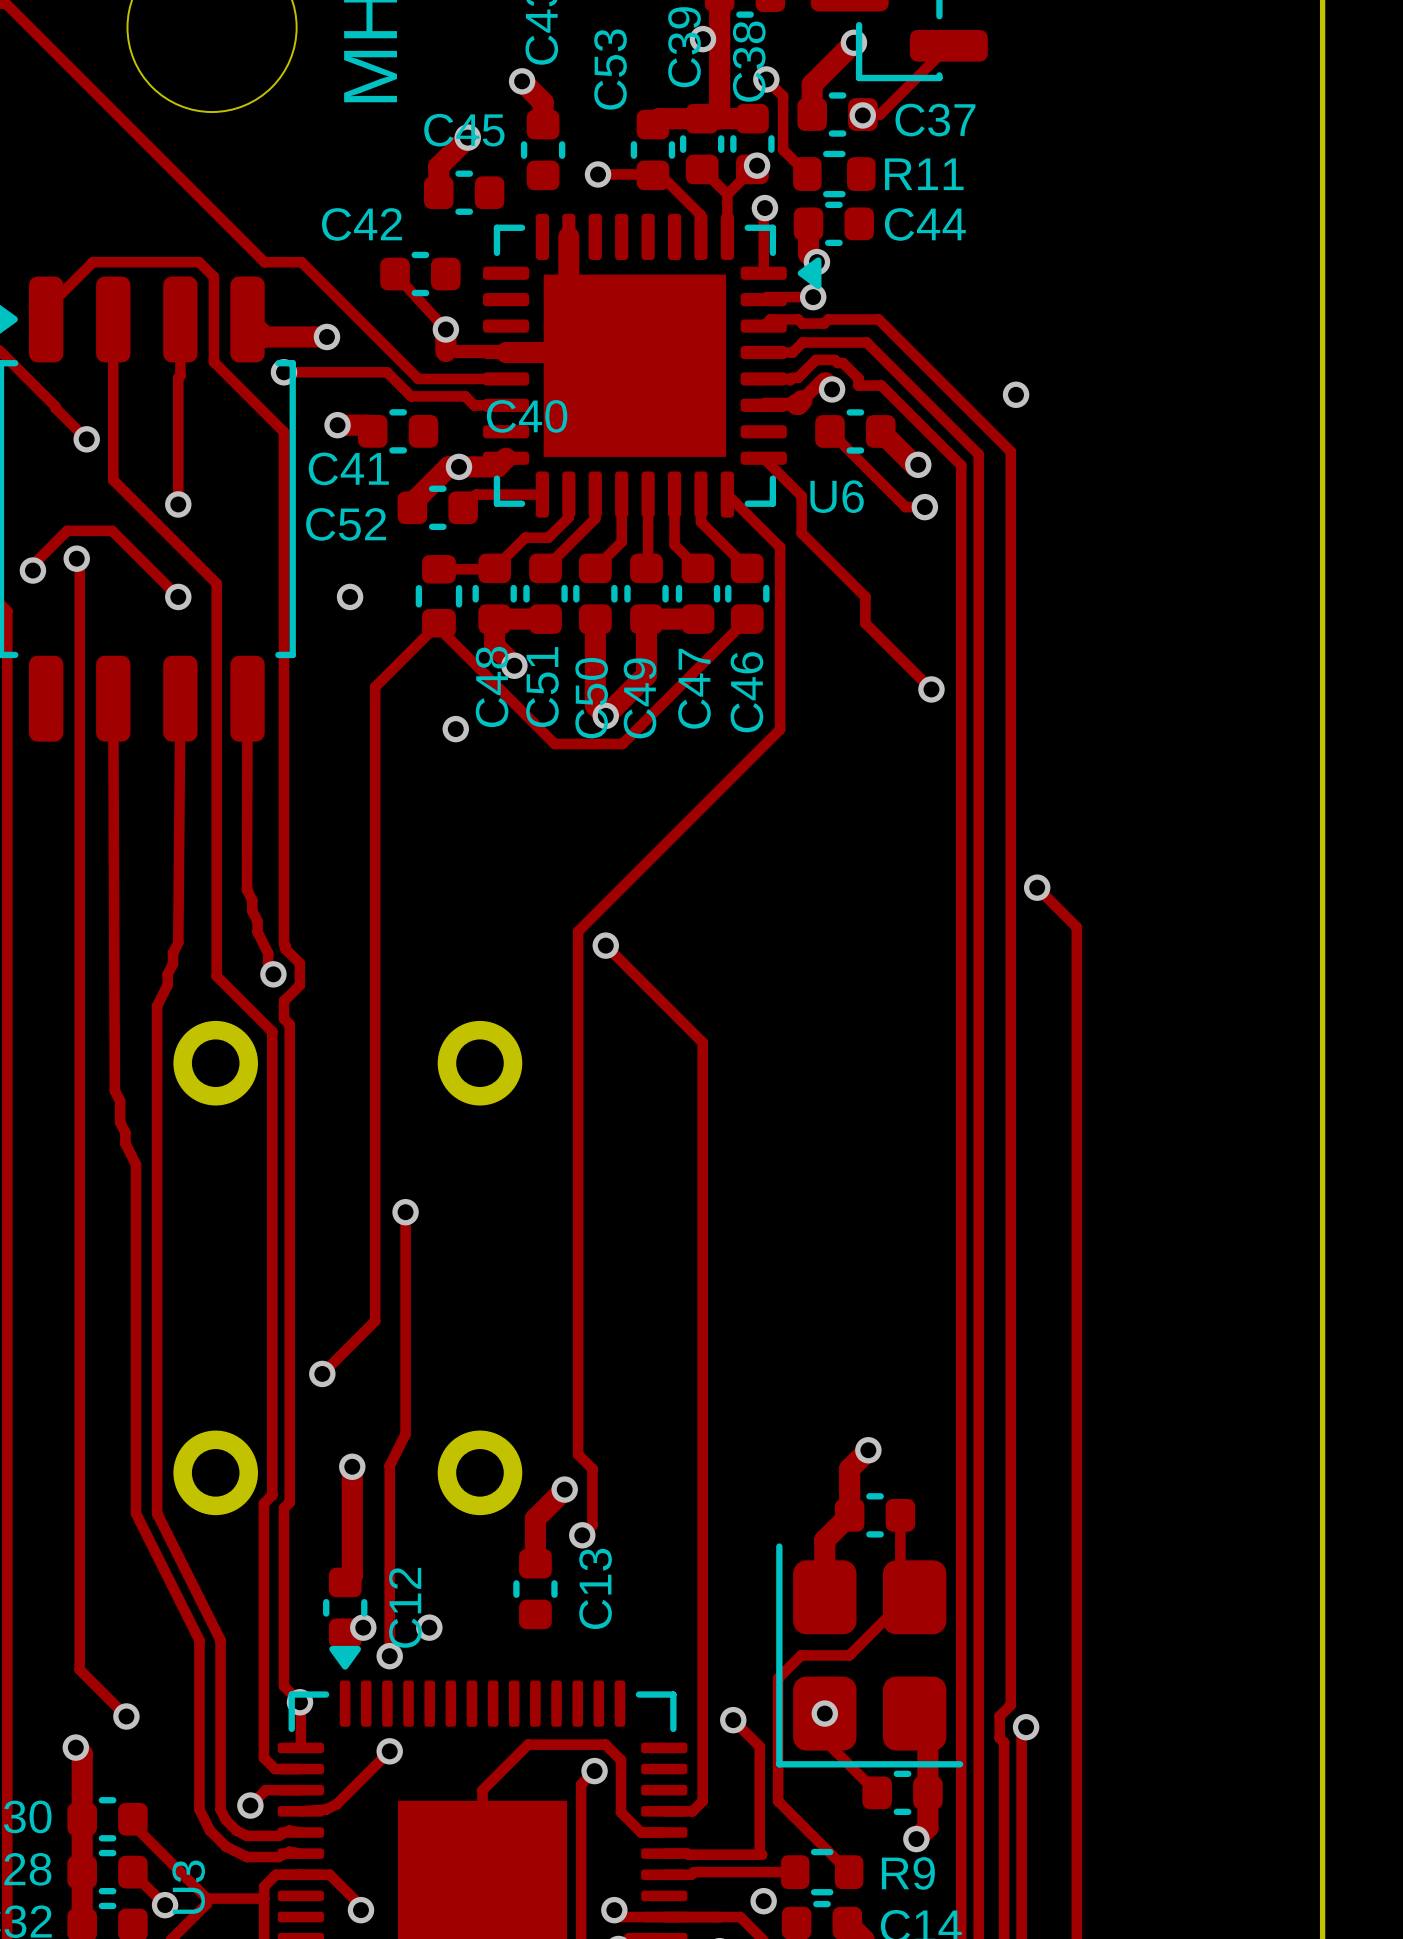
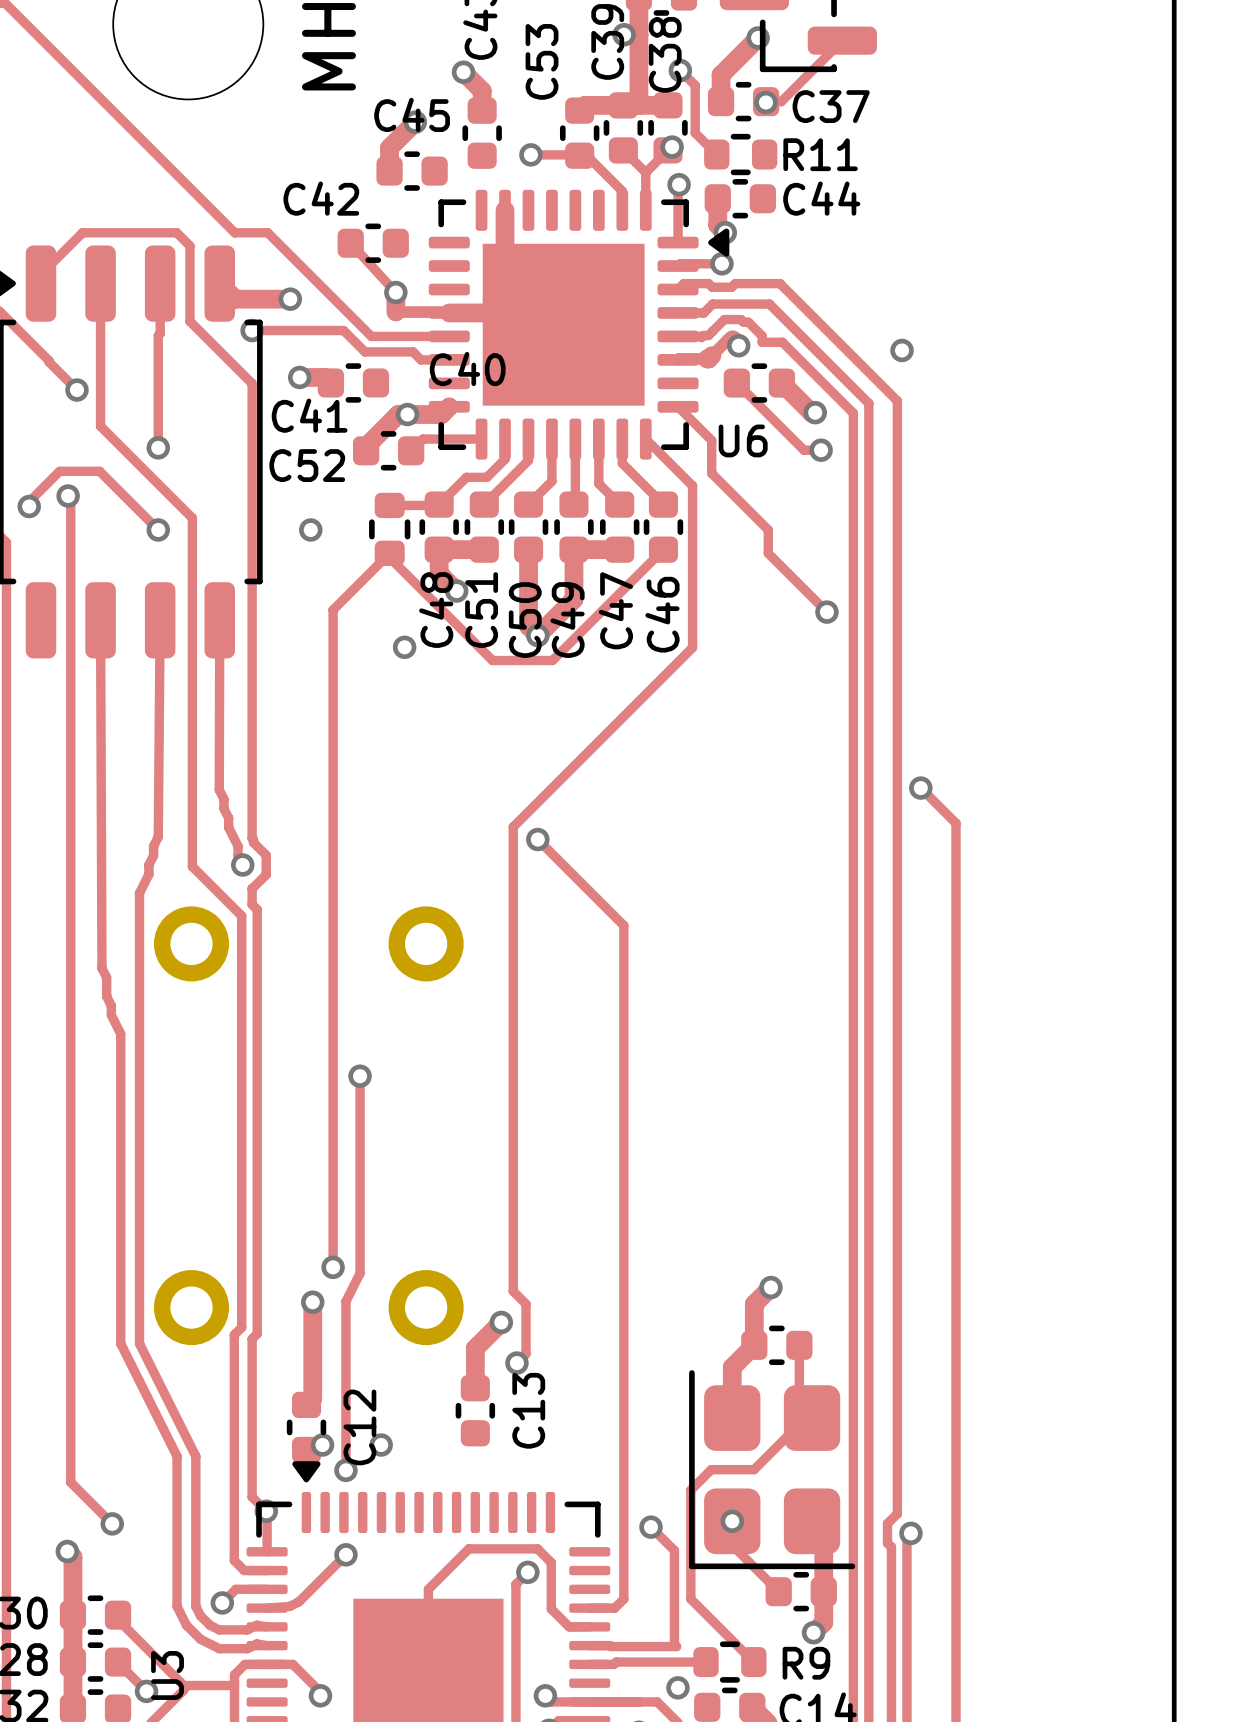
track: (375, 1321) (322, 1373) -> (333, 1172) (333, 1267)
via position: (322, 1373) -> (333, 1267)

